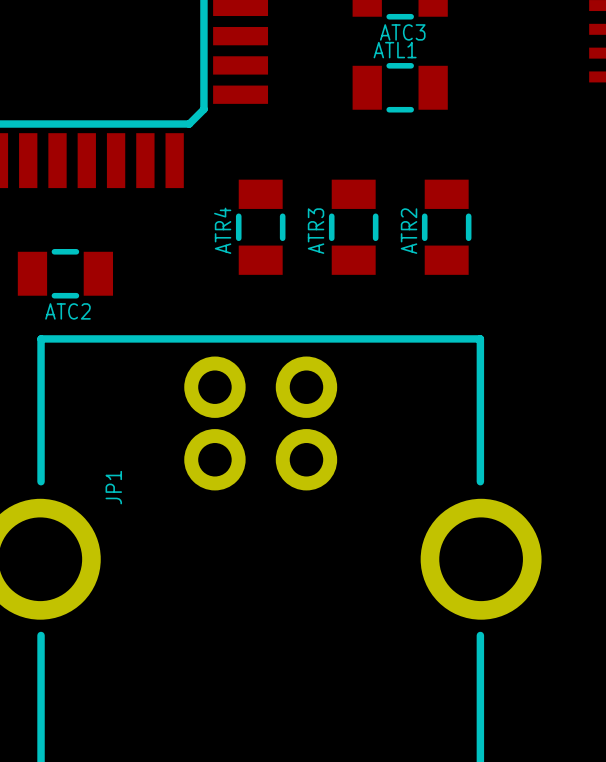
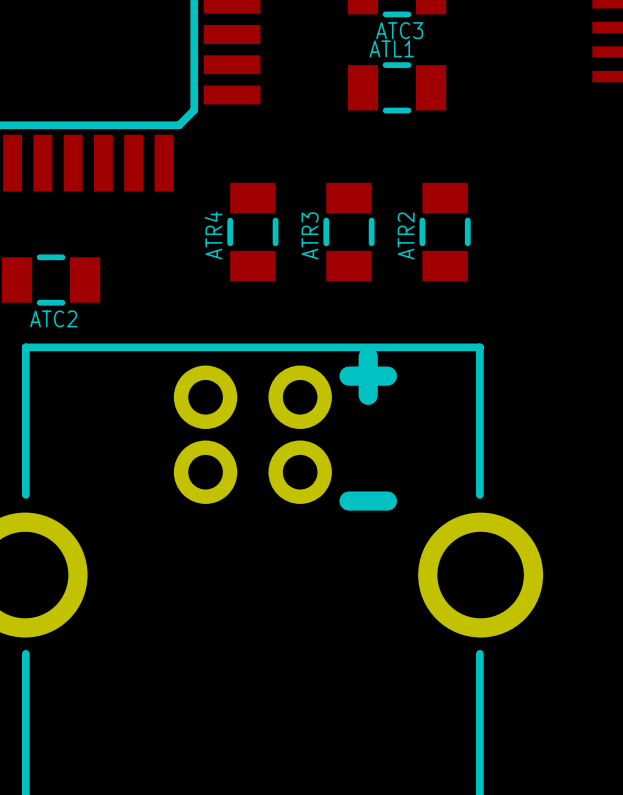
line: none -> (368, 356) (368, 395)
line: none -> (348, 376) (387, 376)
JP1 name: JP1 (113, 487) -> none
line: none -> (348, 501) (387, 501)

